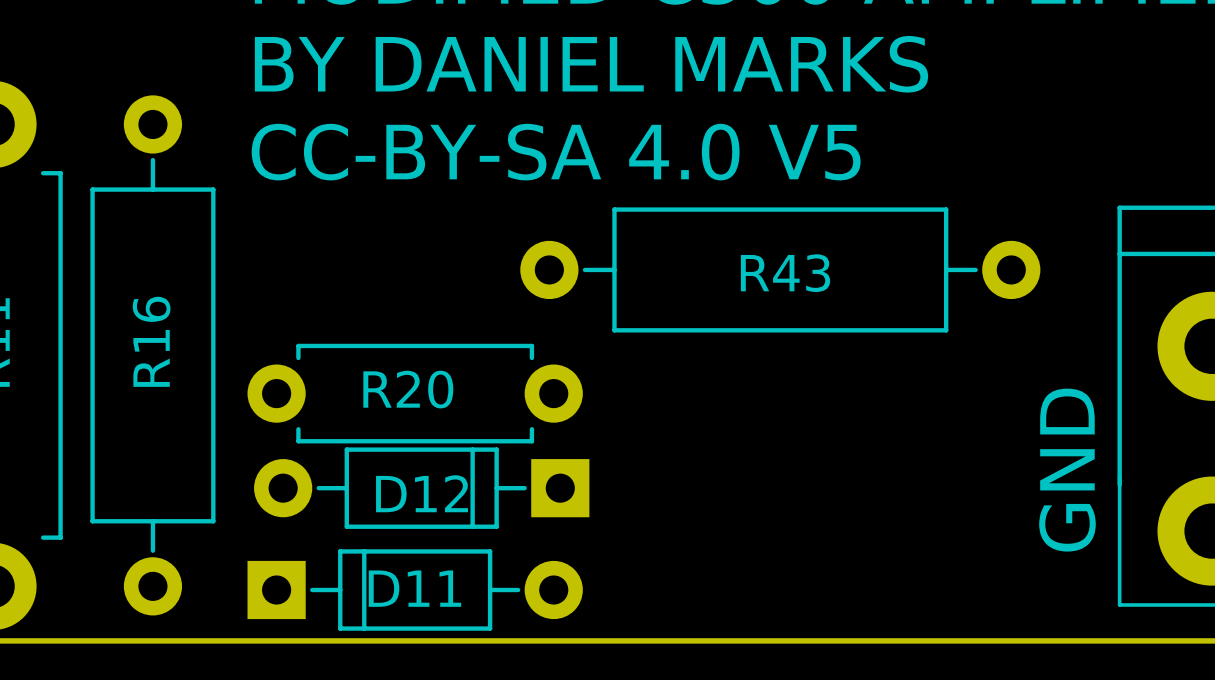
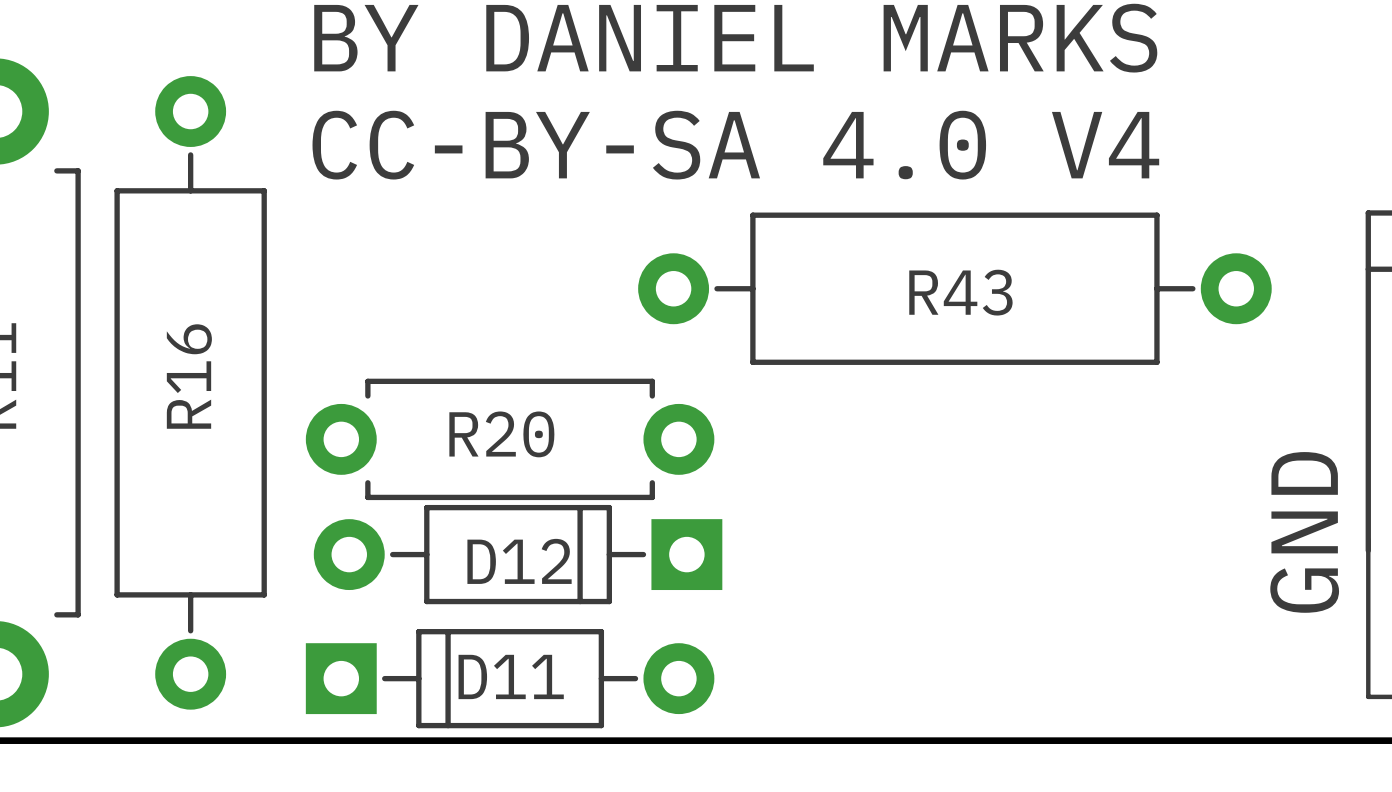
text: CC-BY-SA 4.0 V5 (556, 152) -> CC-BY-SA 4.0 V4 (735, 145)

